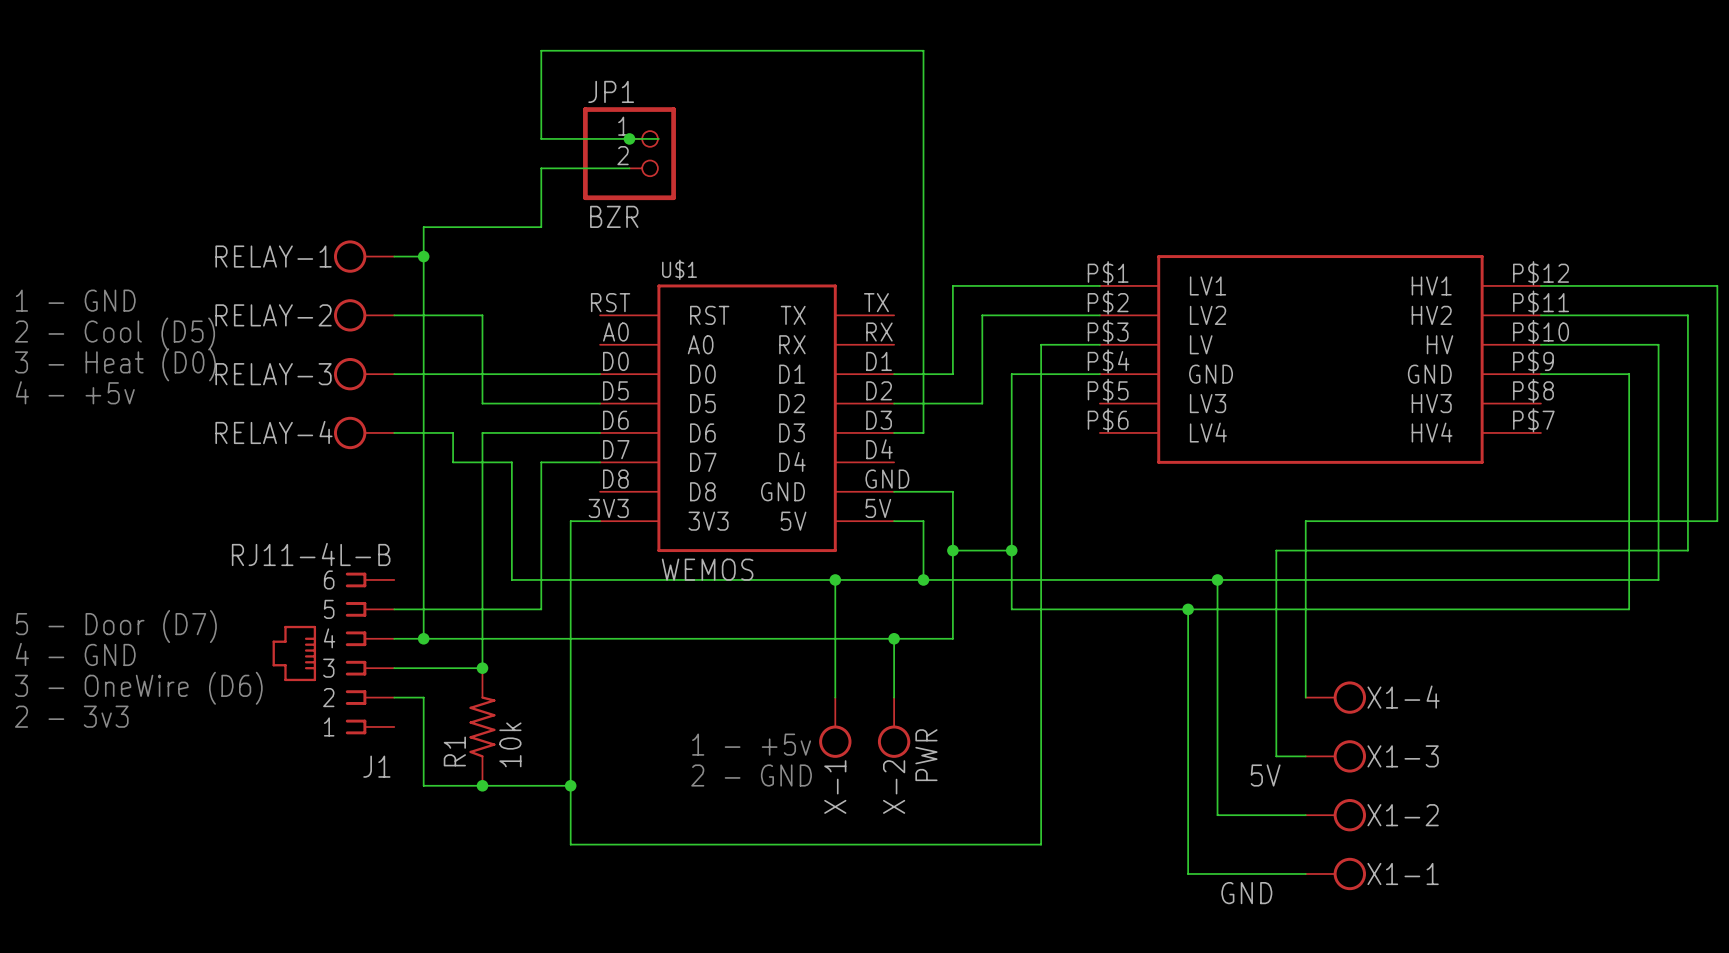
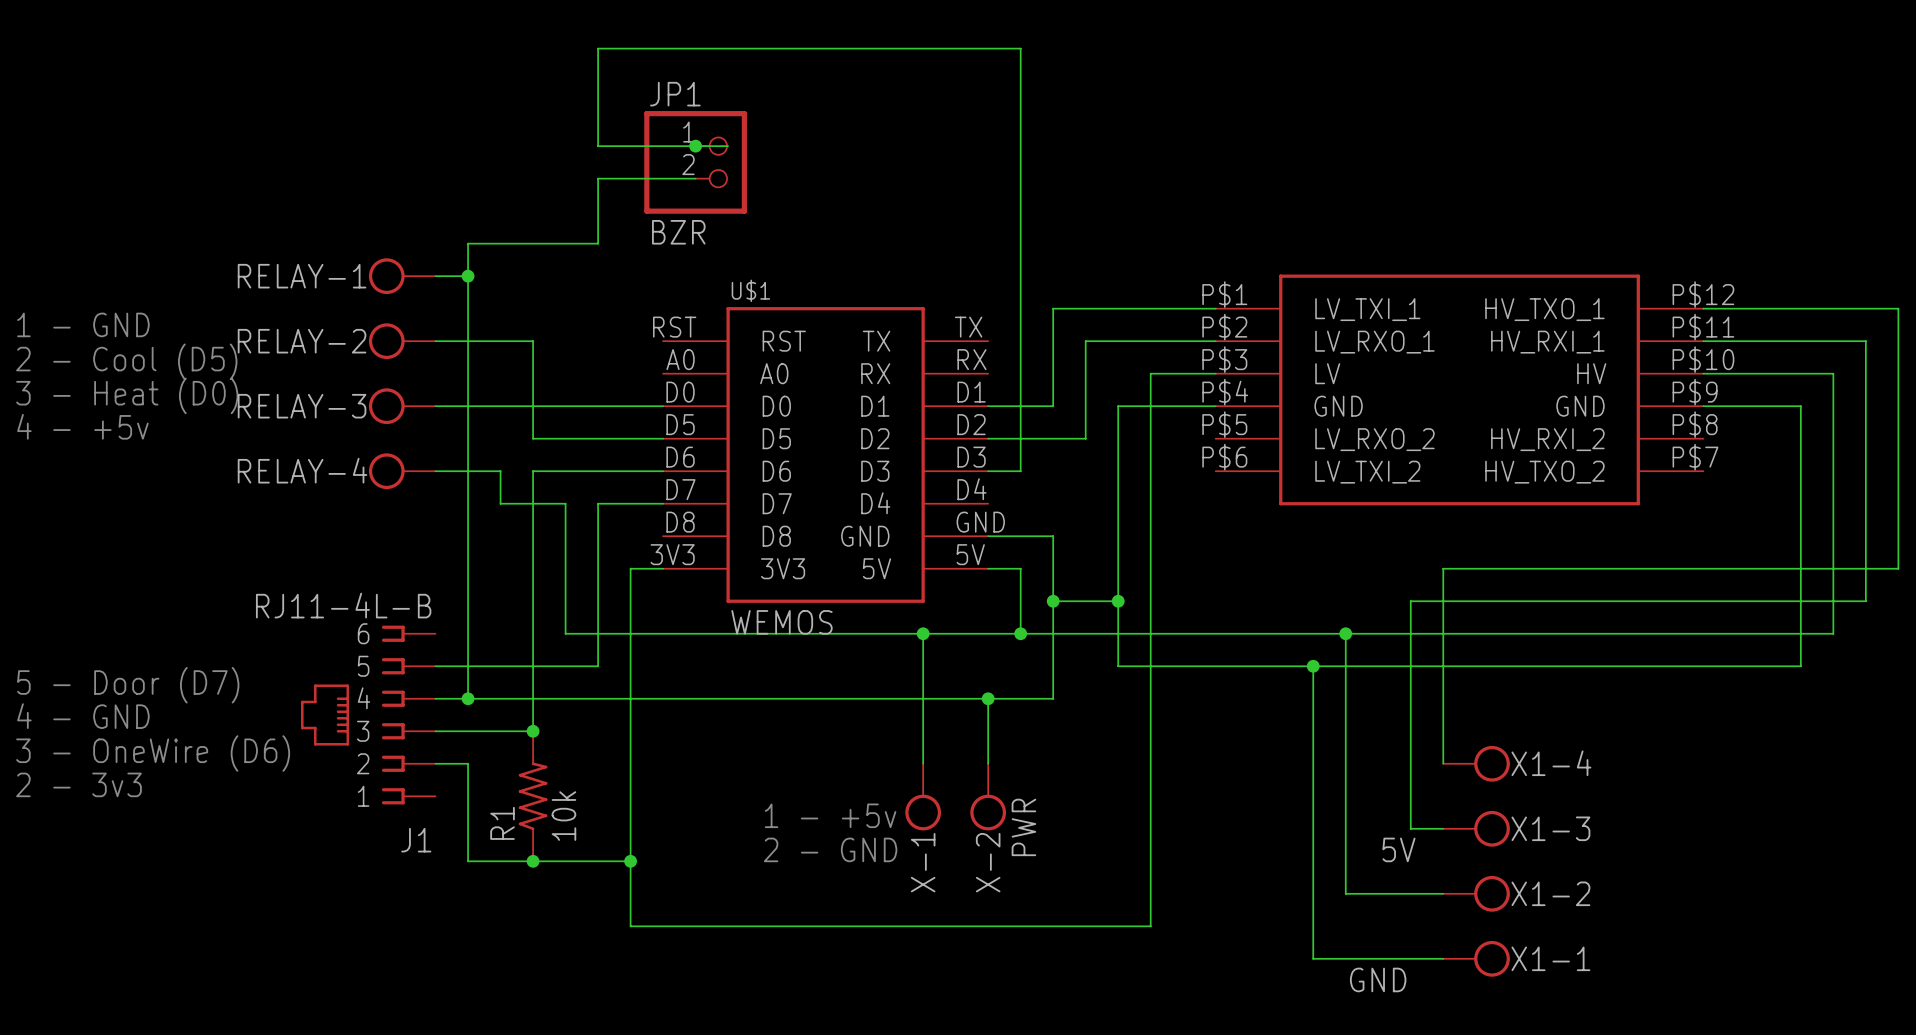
part pin name: LV1 (1208, 285) -> LV_TXI_1 (1367, 309)
part pin name: HV1 (1431, 285) -> HV_TXO_1 (1544, 309)
part pin name: LV2 (1208, 315) -> LV_RXO_1 (1374, 342)
part pin name: HV2 (1431, 315) -> HV_RXI_1 (1547, 342)
part pin name: LV3 (1208, 403) -> LV_RXO_2 (1374, 439)
part pin name: HV3 (1431, 403) -> HV_RXI_2 (1547, 439)
part pin name: LV4 (1208, 432) -> LV_TXI_2 (1367, 472)
part pin name: HV4 (1432, 432) -> HV_TXO_2 (1544, 472)

